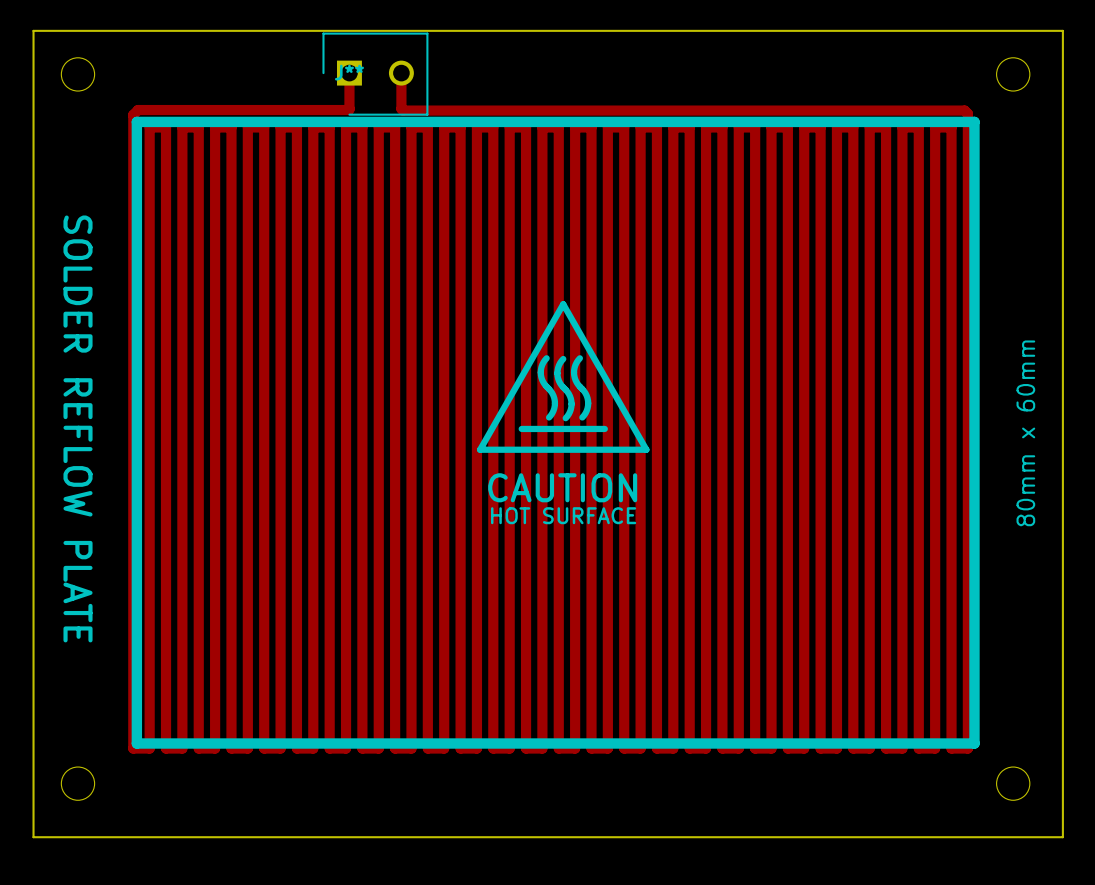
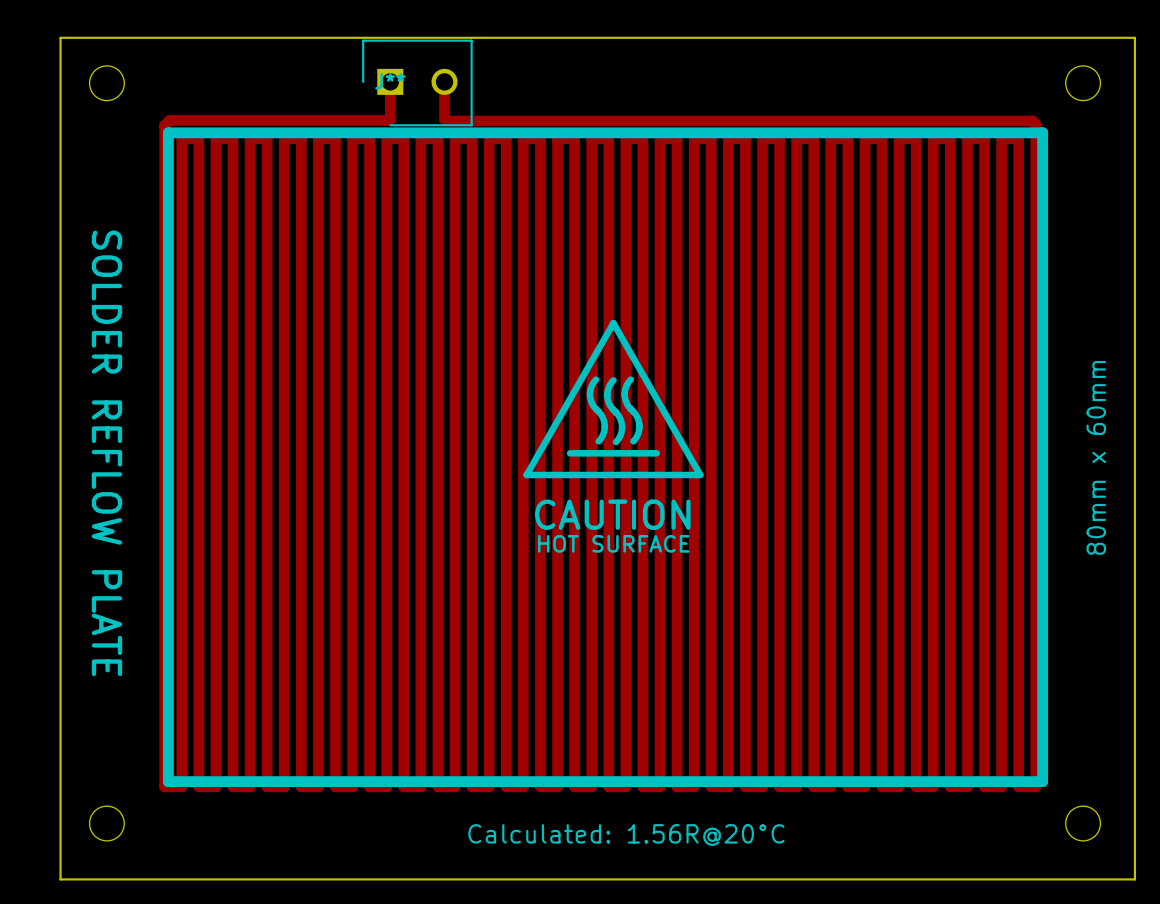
text: none -> Calculated: 1.56R@20°C (626, 835)

